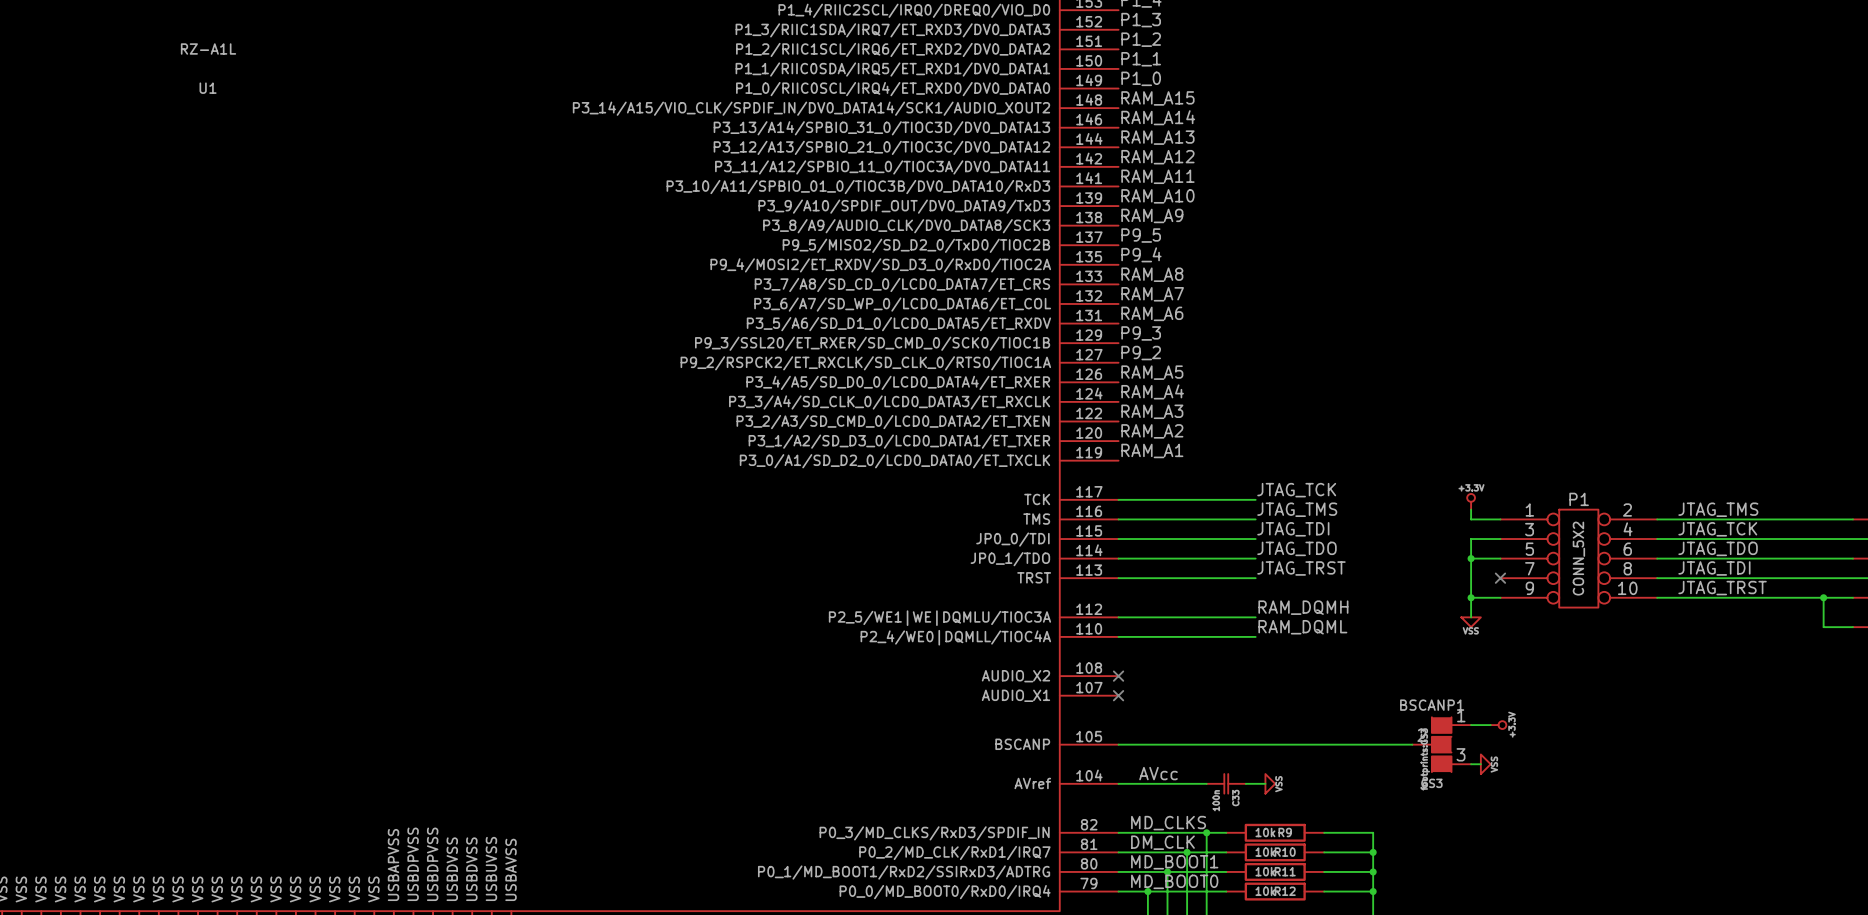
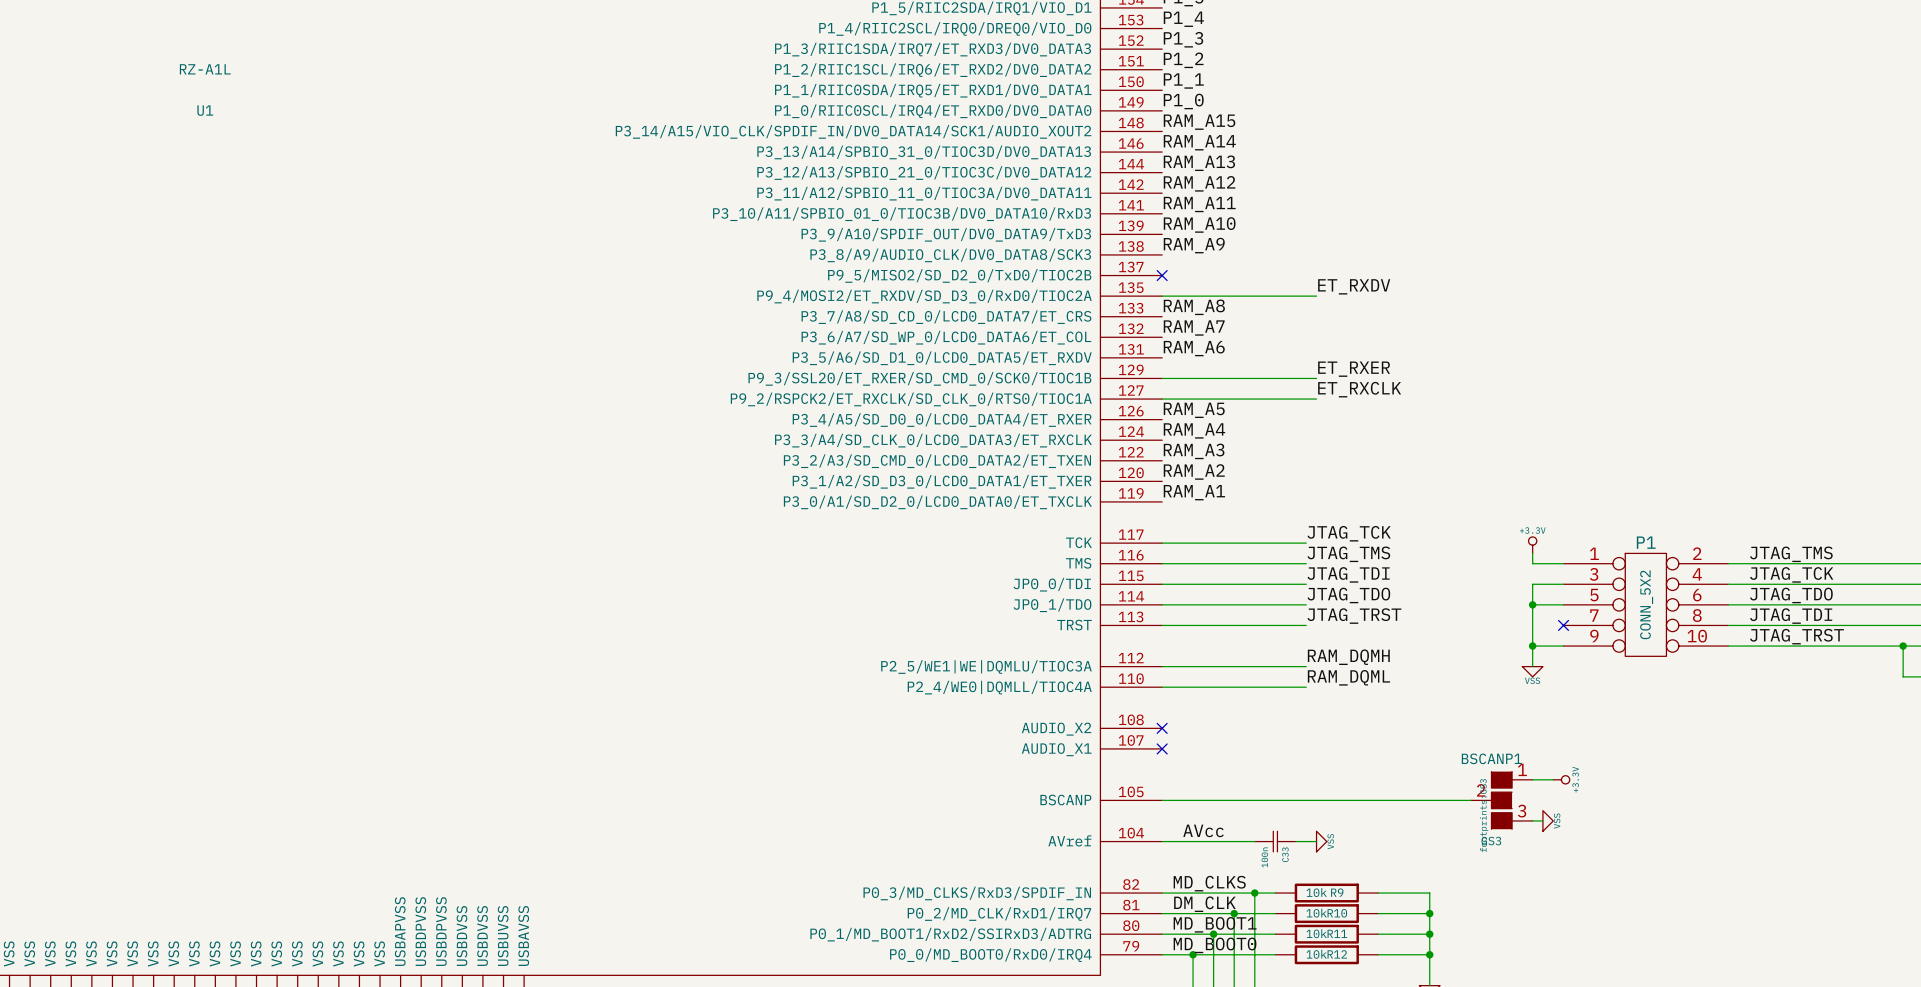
label: P9_5 (1141, 235) -> none
no-connect mark: none -> (1162, 275)
label: P9_4 (1141, 254) -> none
label: none -> ET_RXDV (1354, 286)
wire: none -> (1162, 296) (1316, 296)
label: P9_3 (1141, 333) -> none
label: none -> ET_RXER (1354, 369)
wire: none -> (1162, 378) (1316, 378)
label: P9_2 (1141, 353) -> none
label: none -> ET_RXCLK (1359, 389)
wire: none -> (1162, 399) (1316, 399)

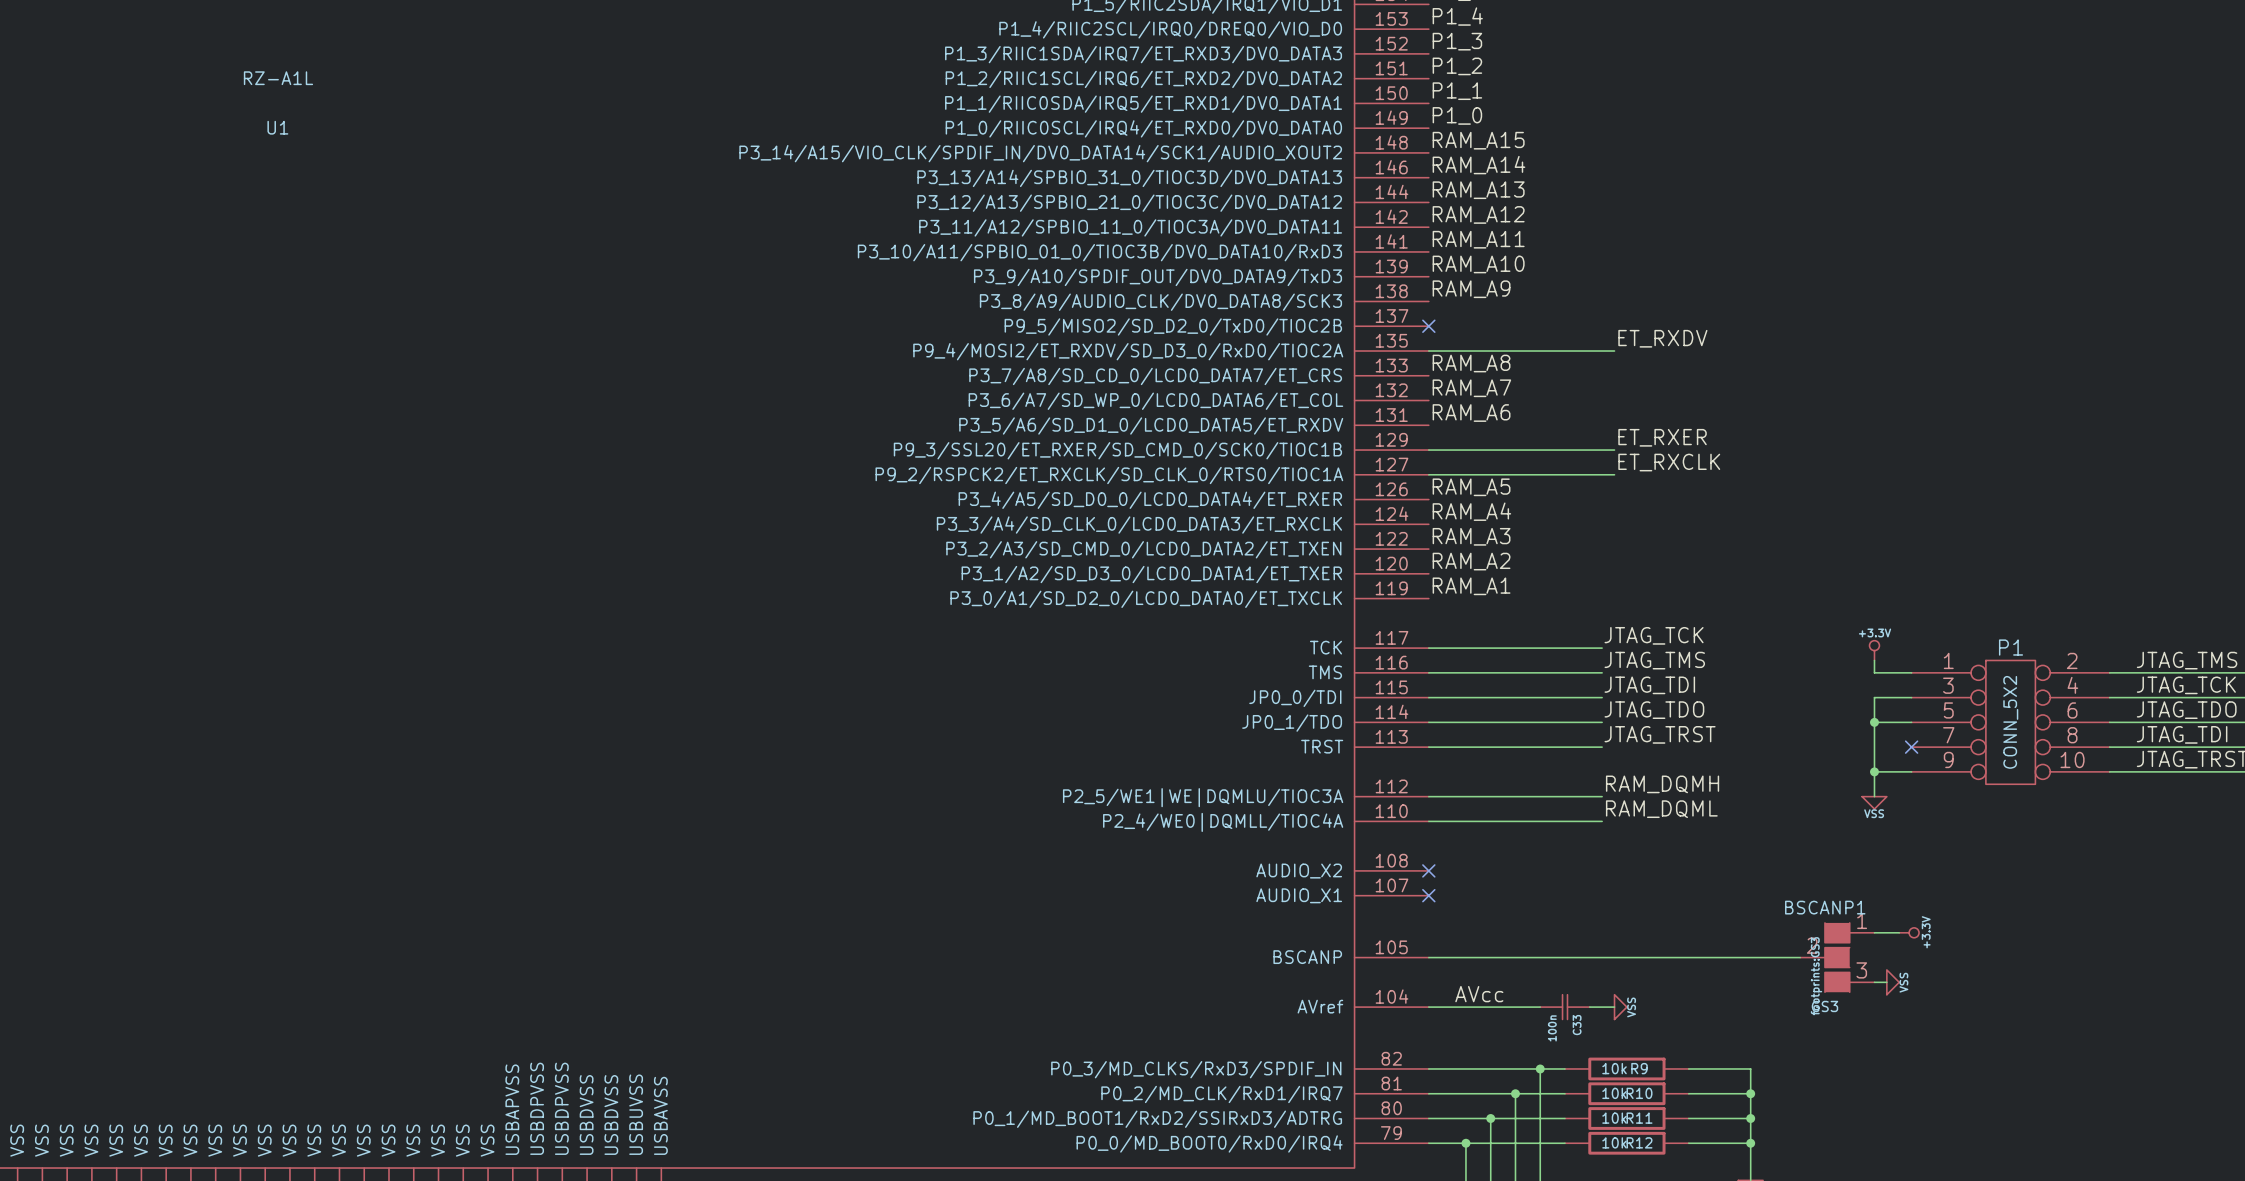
label: MD_CLKS (1209, 883) -> none
label: DM_CLK (1204, 904) -> none
label: MD_BOOT1 (1215, 924) -> none
label: MD_BOOT0 (1215, 945) -> none

